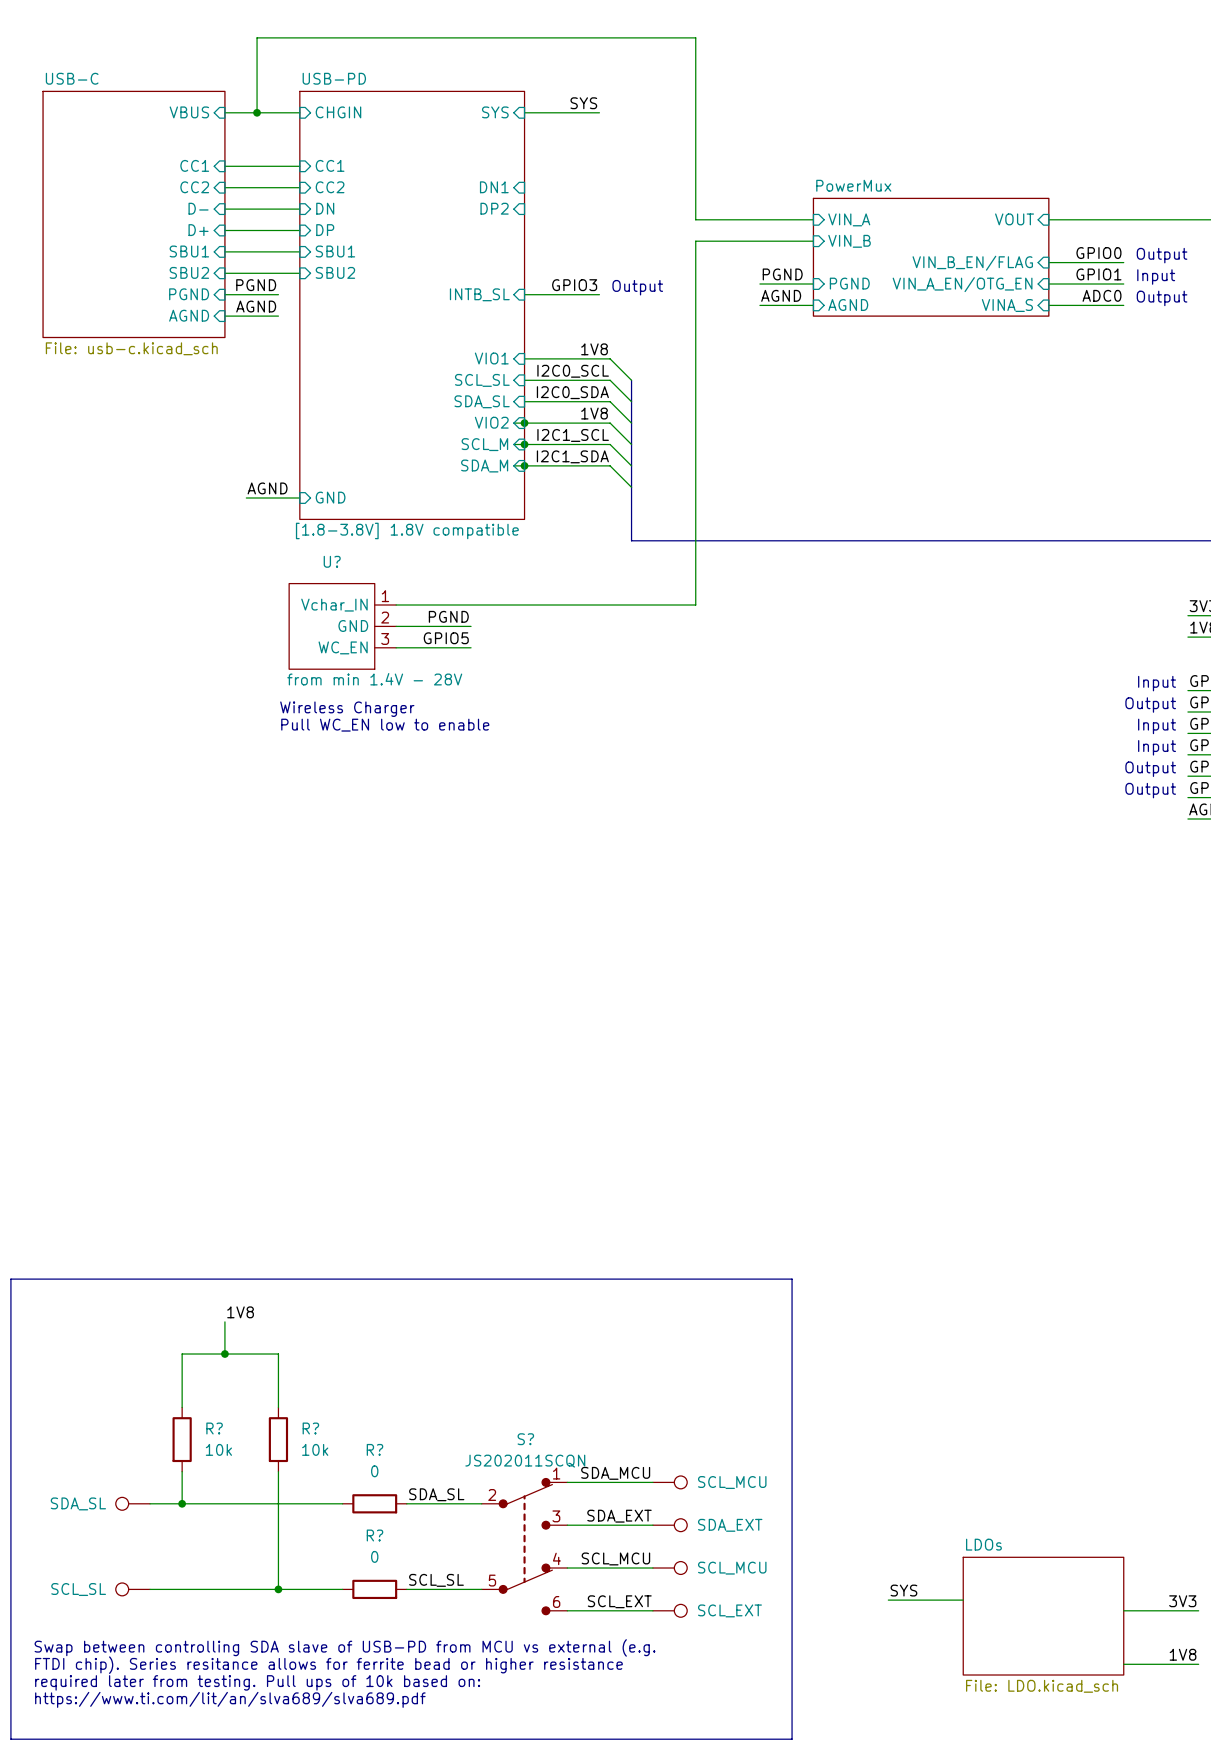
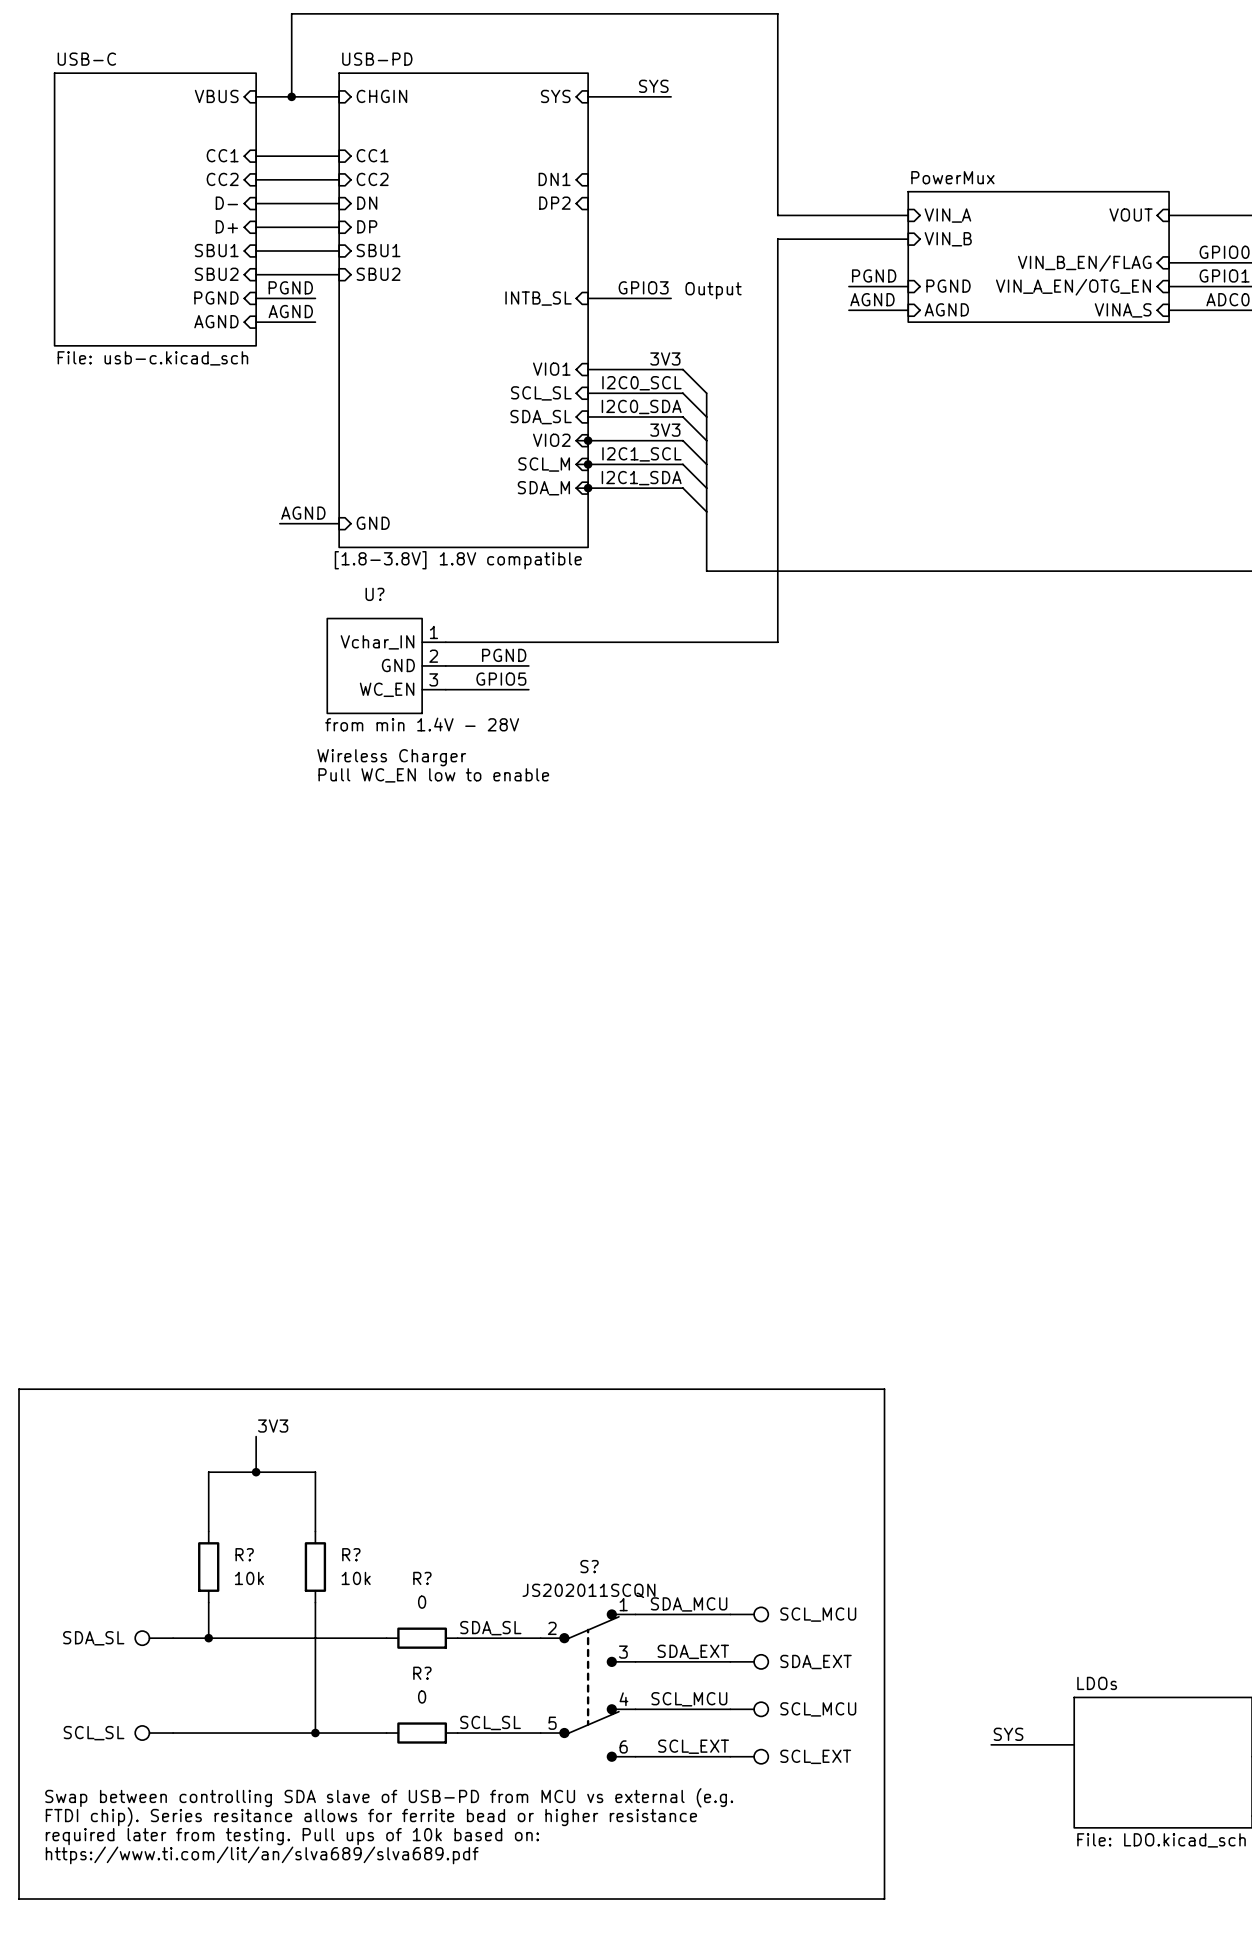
label: 1V8 (594, 349) -> 3V3 (665, 358)
label: 1V8 (594, 413) -> 3V3 (665, 430)
label: 1V8 (240, 1312) -> 3V3 (273, 1426)

